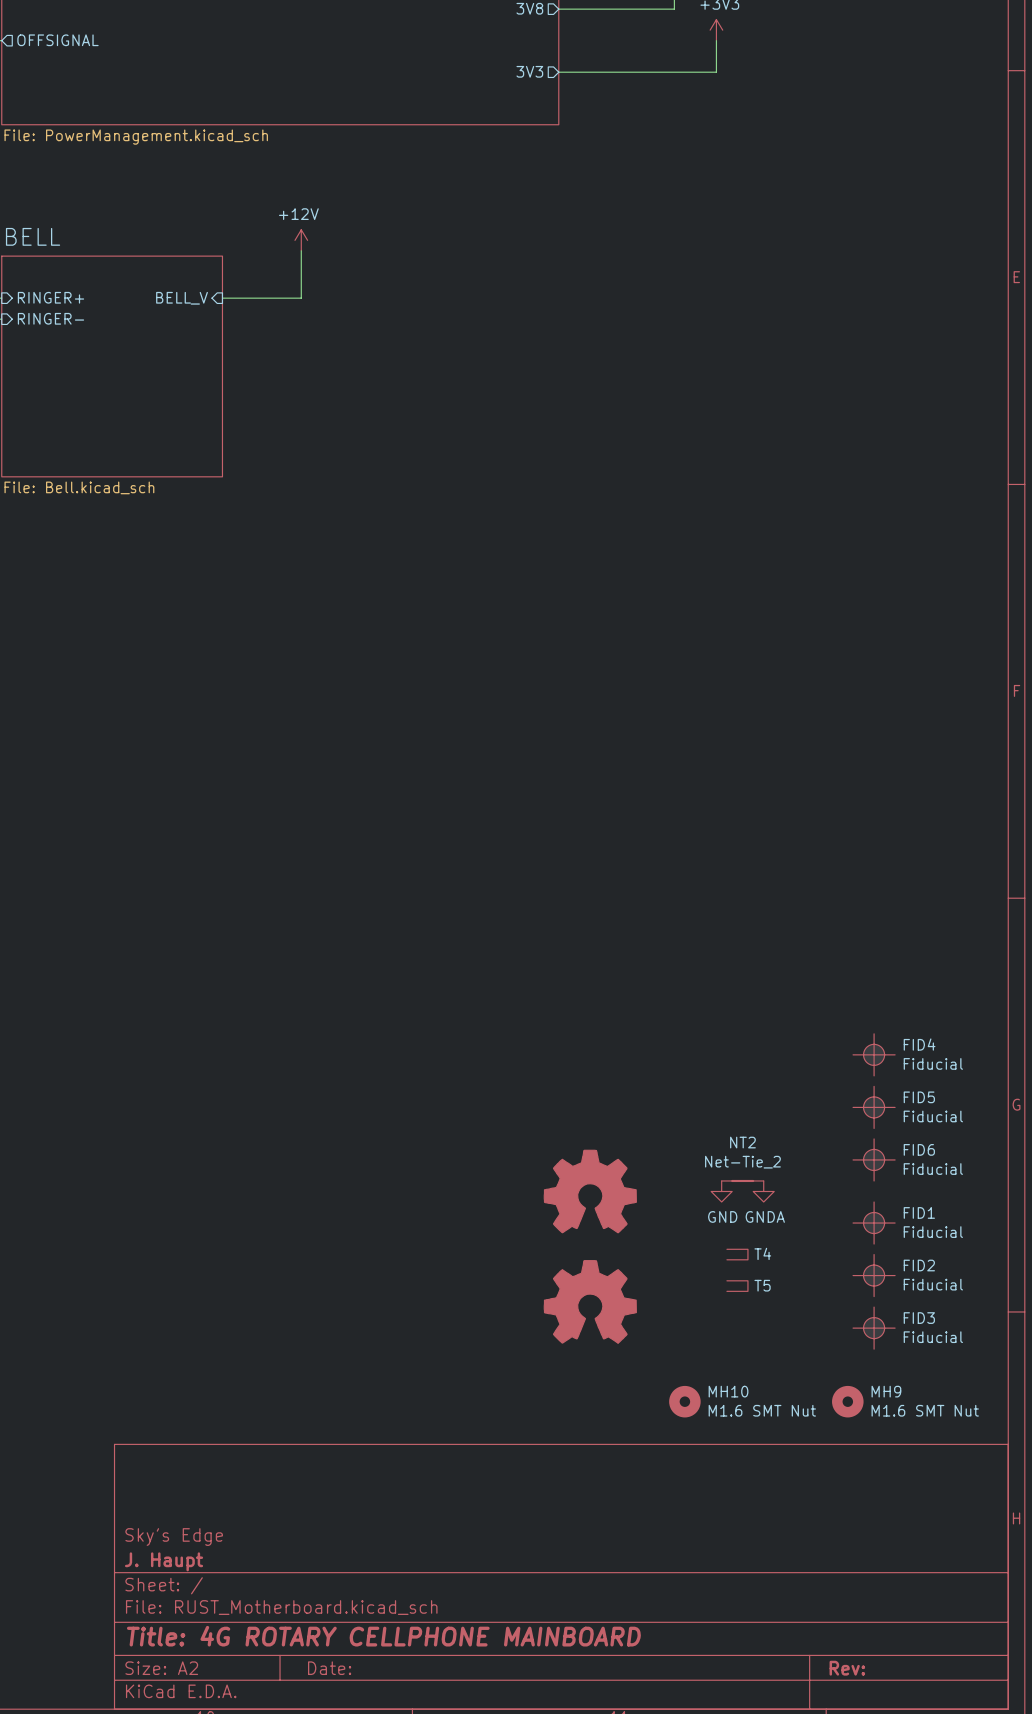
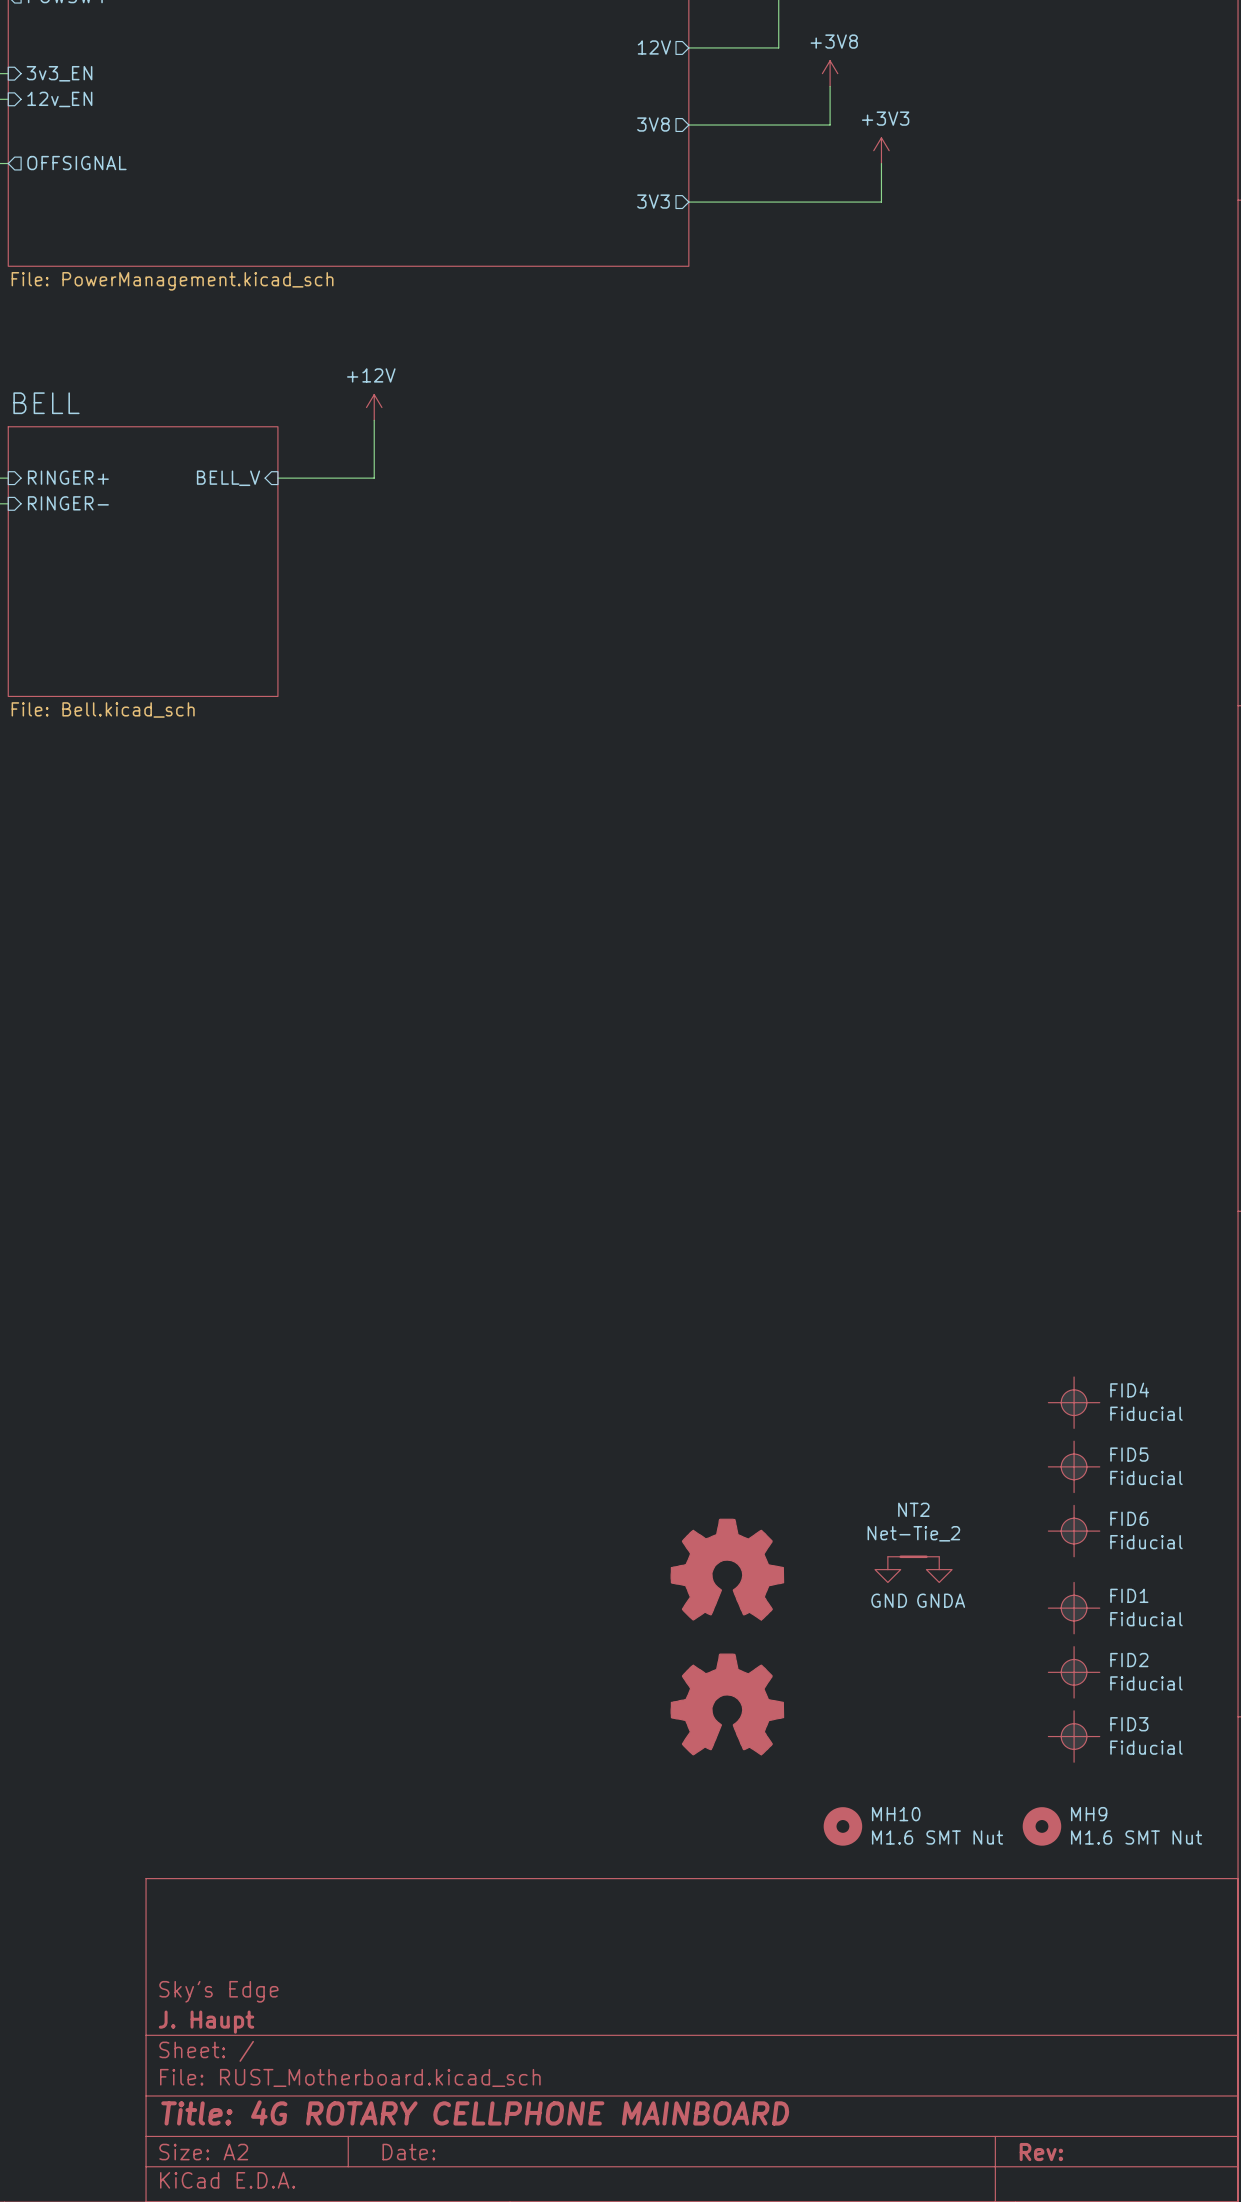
T4: (737, 1254) -> none
T5: (737, 1286) -> none

